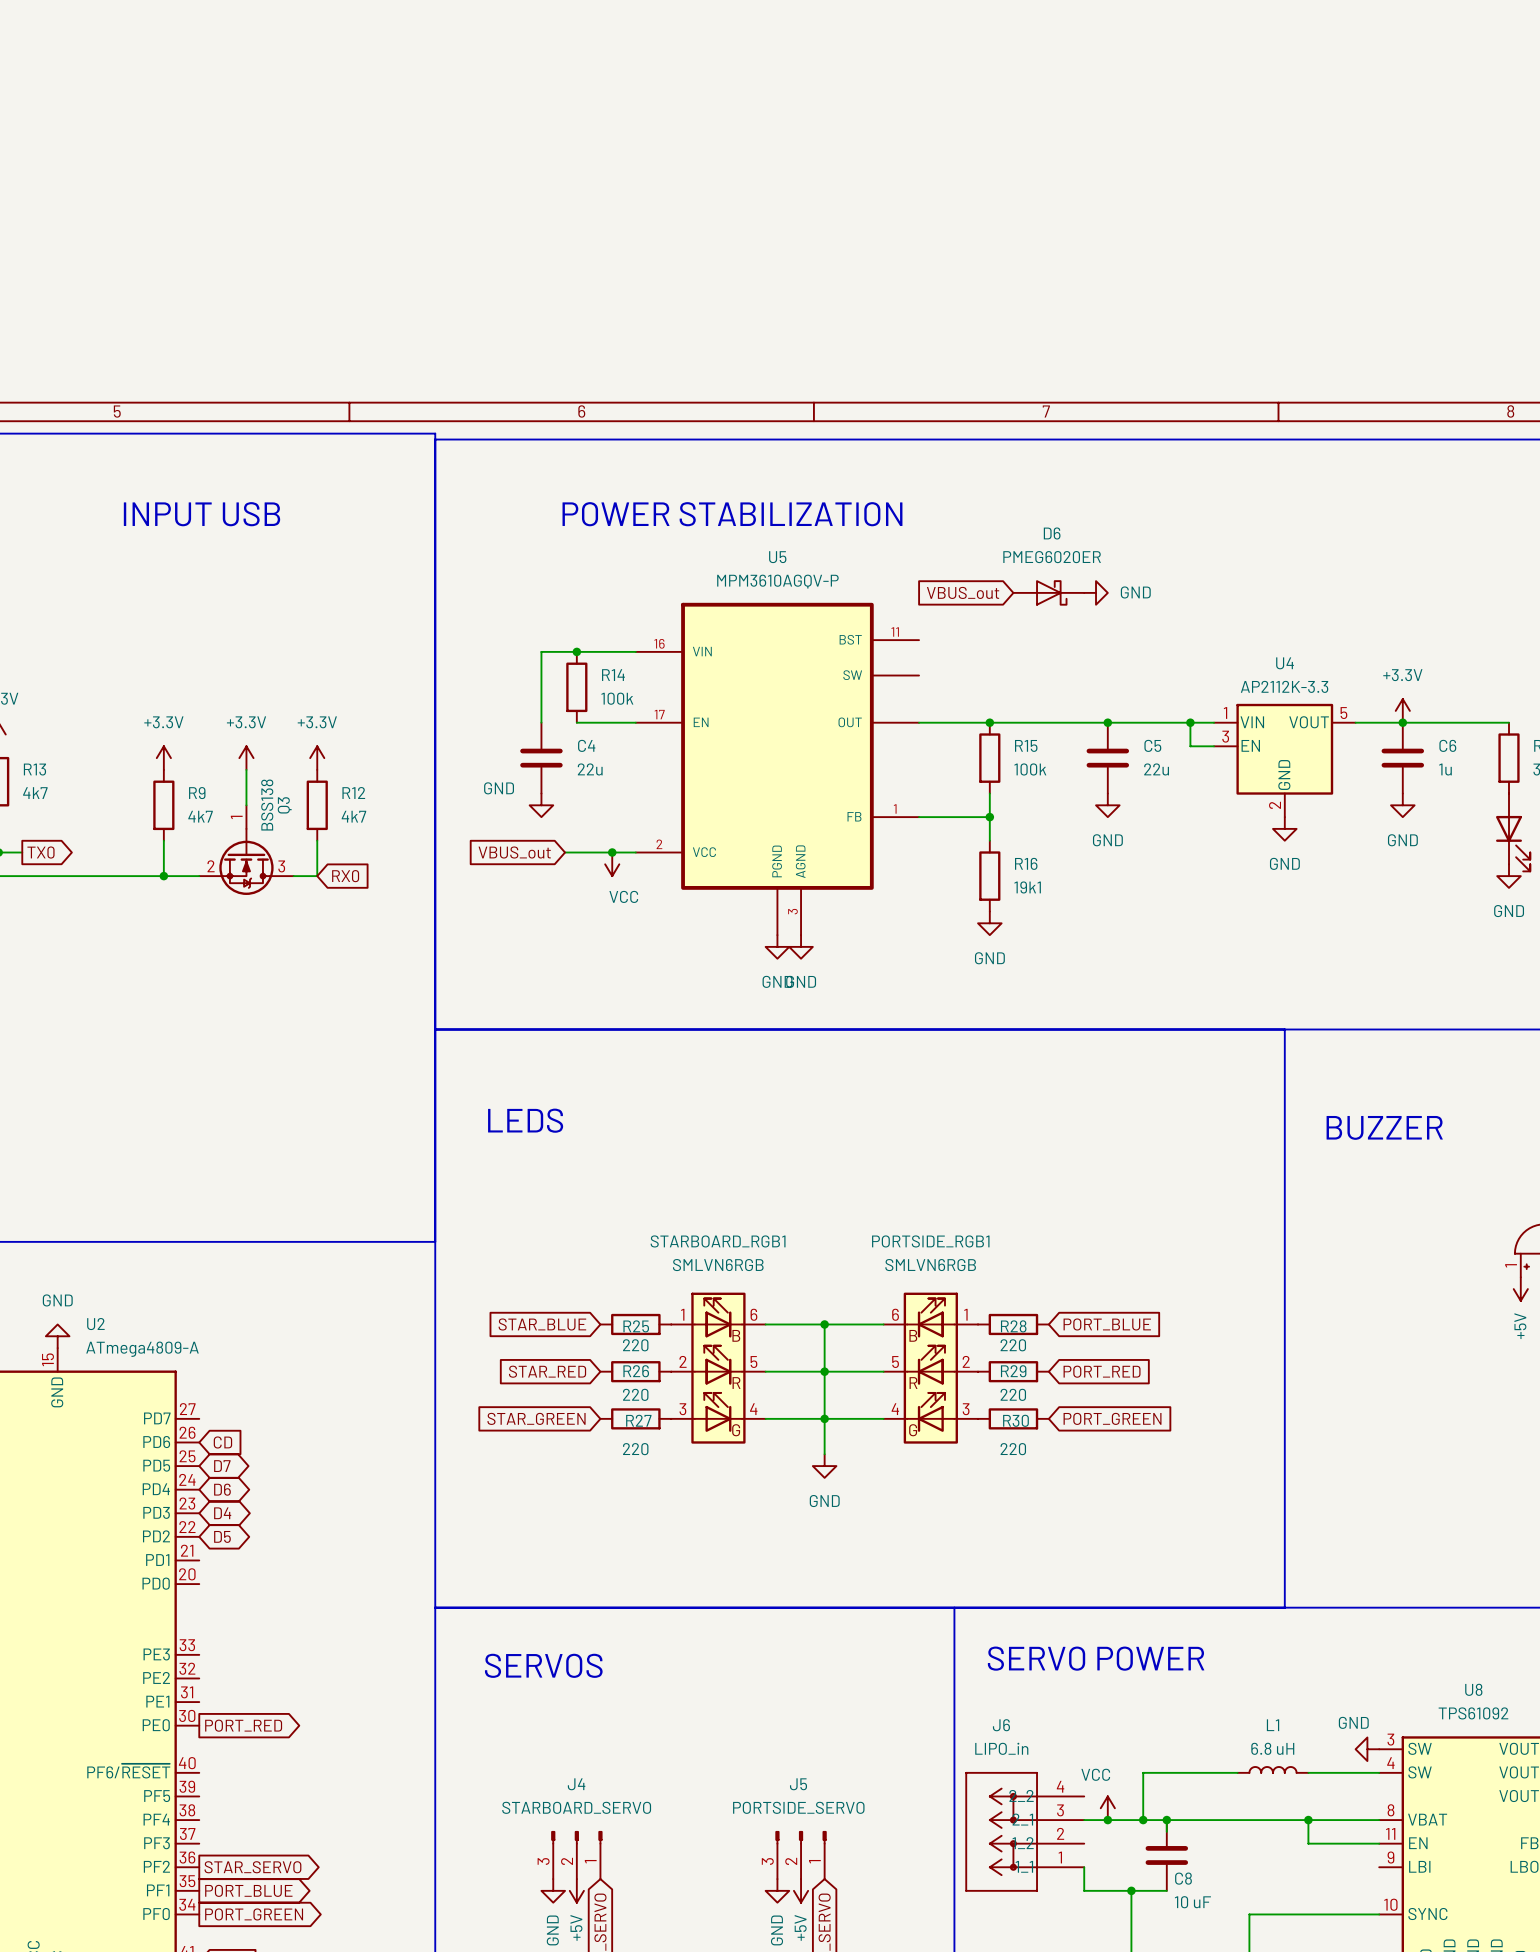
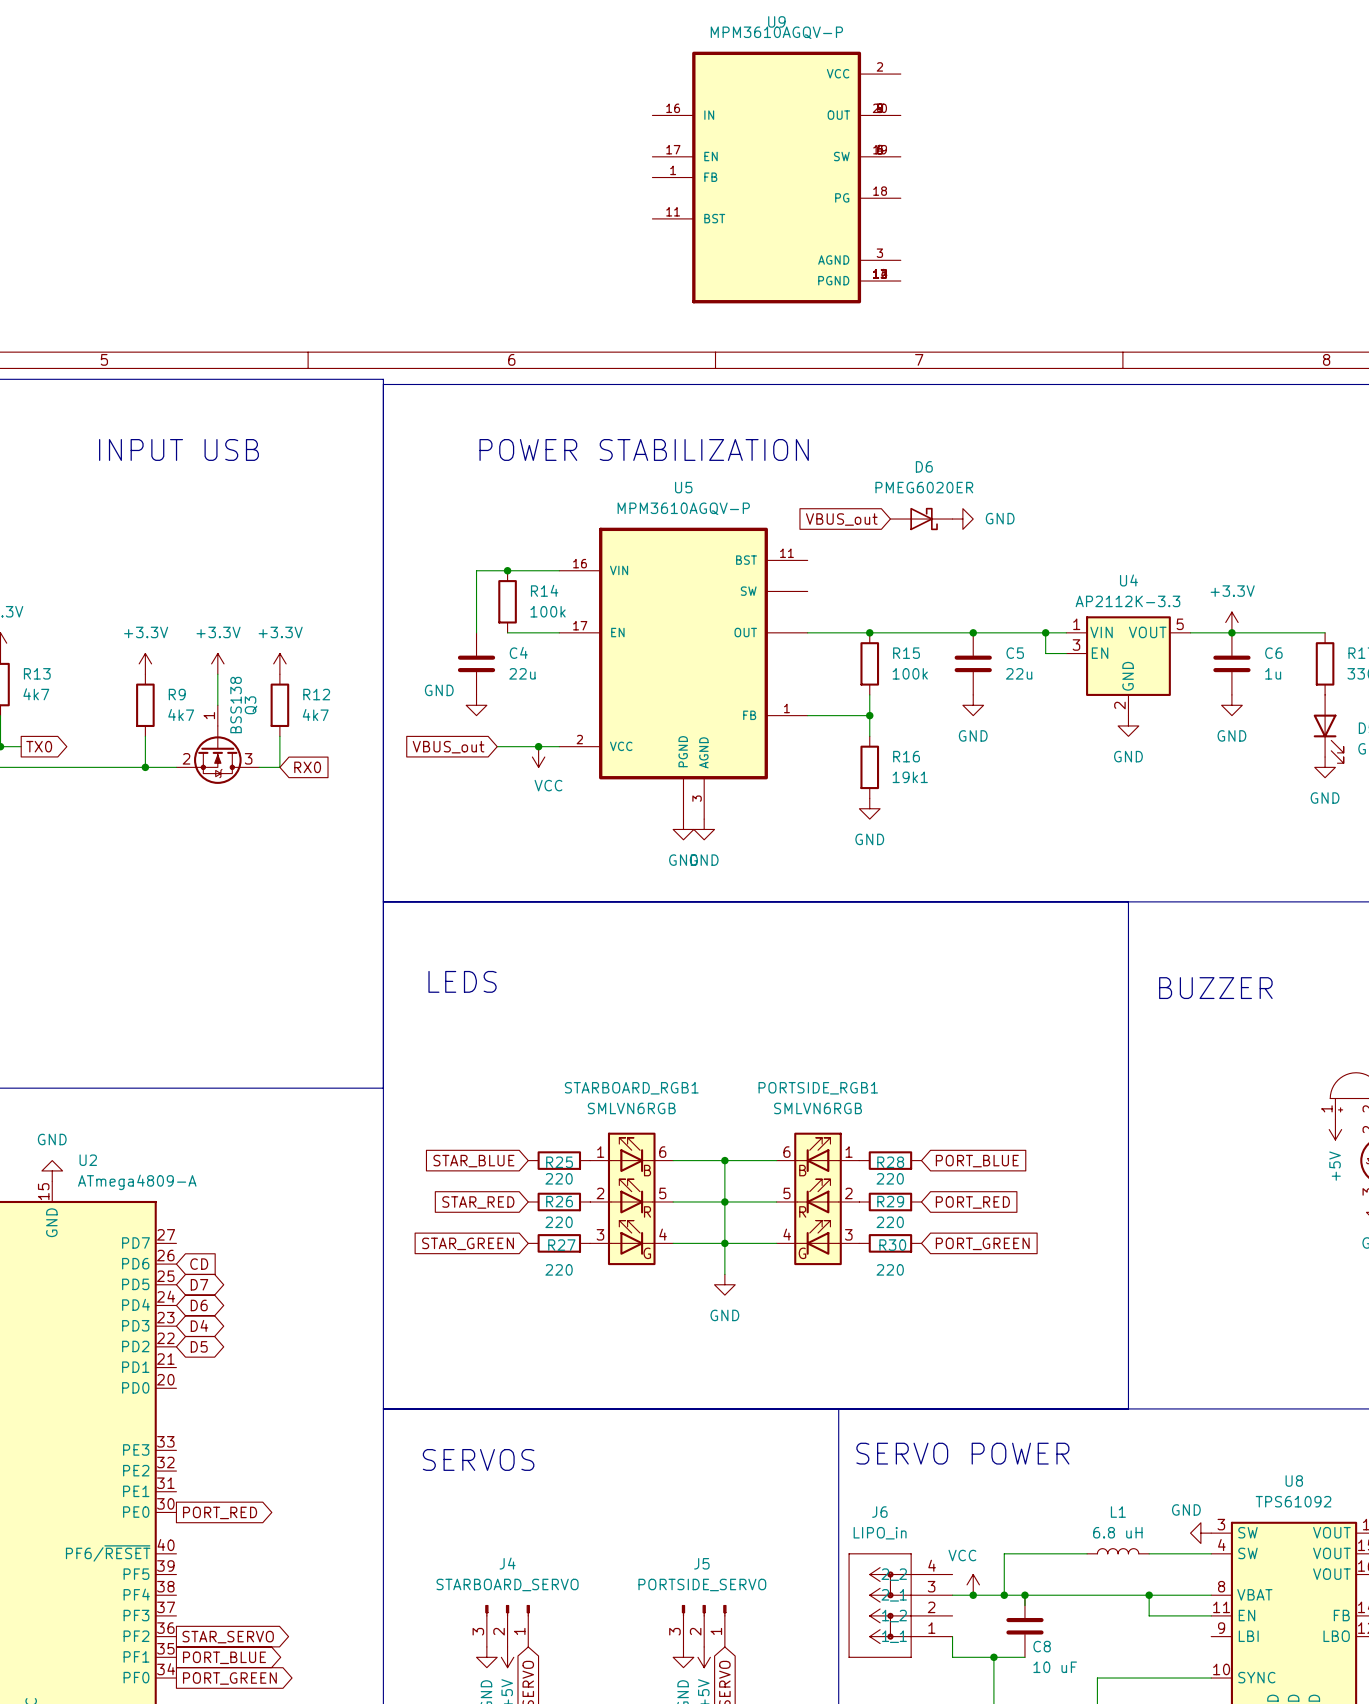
U9: none -> MPM3610AGQV-P (776, 177)

